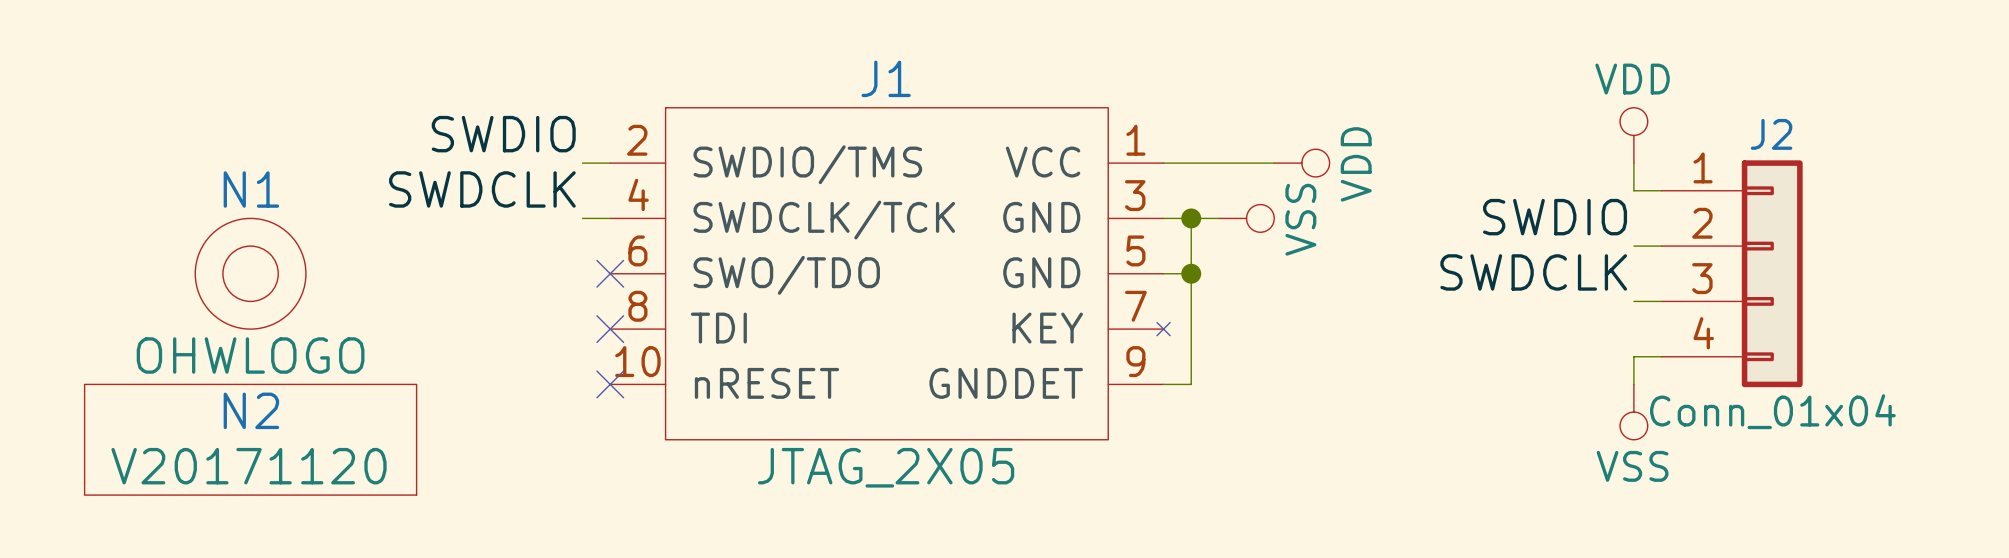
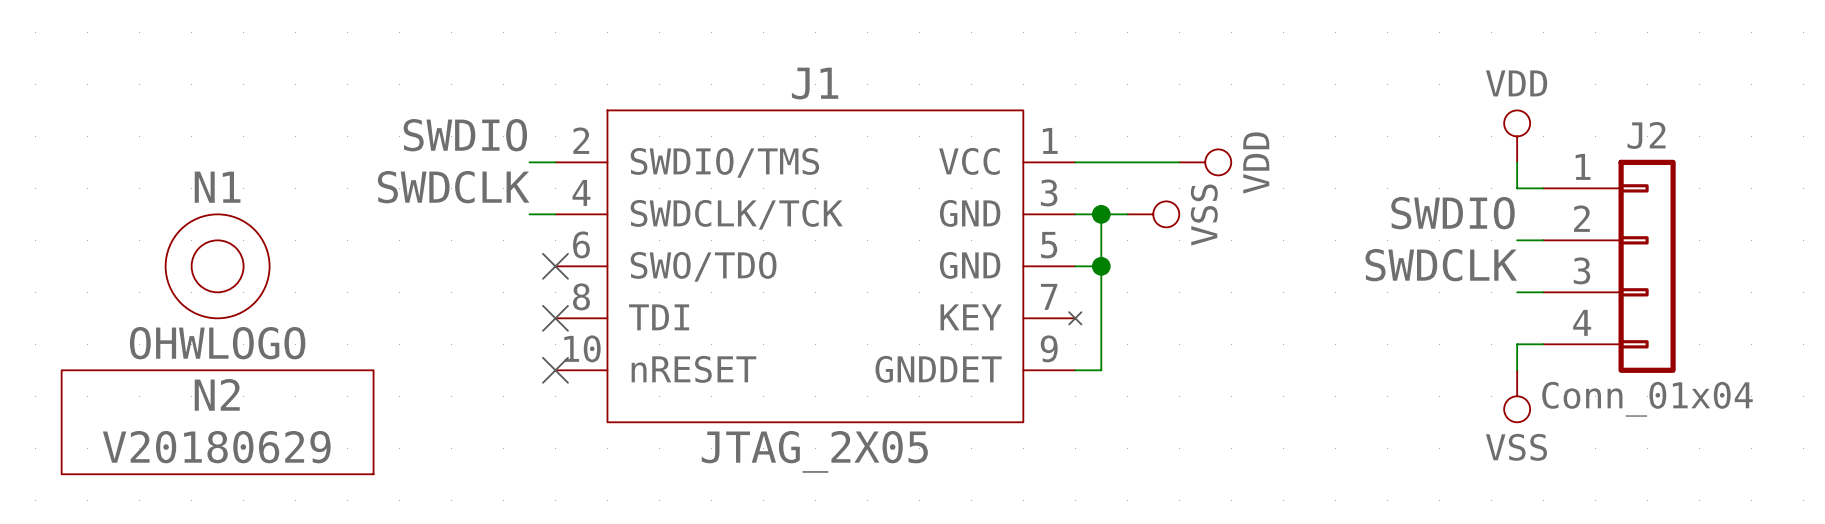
N2 value: V20171120 (249, 466) -> V20180629 (216, 447)

